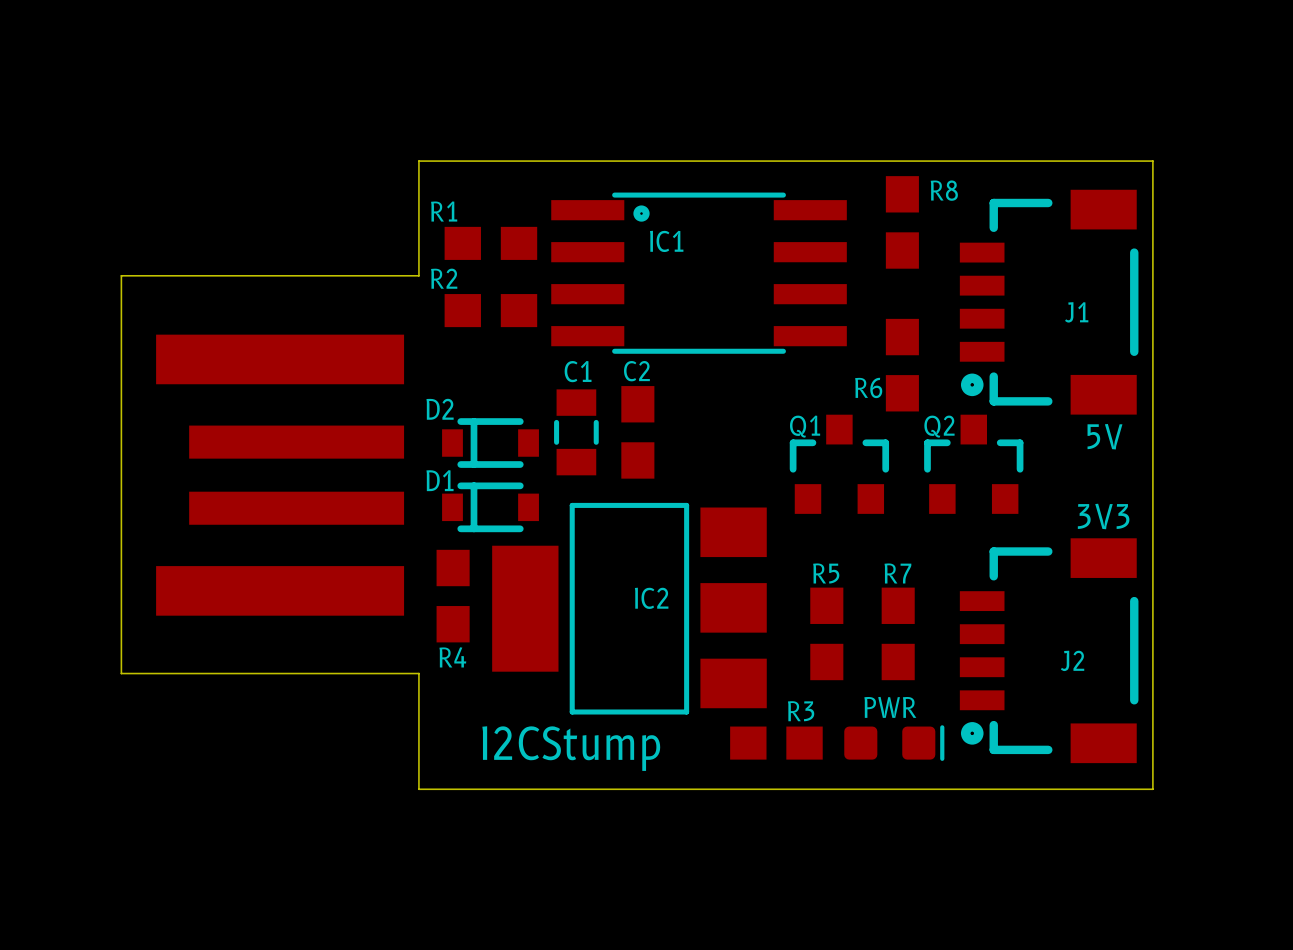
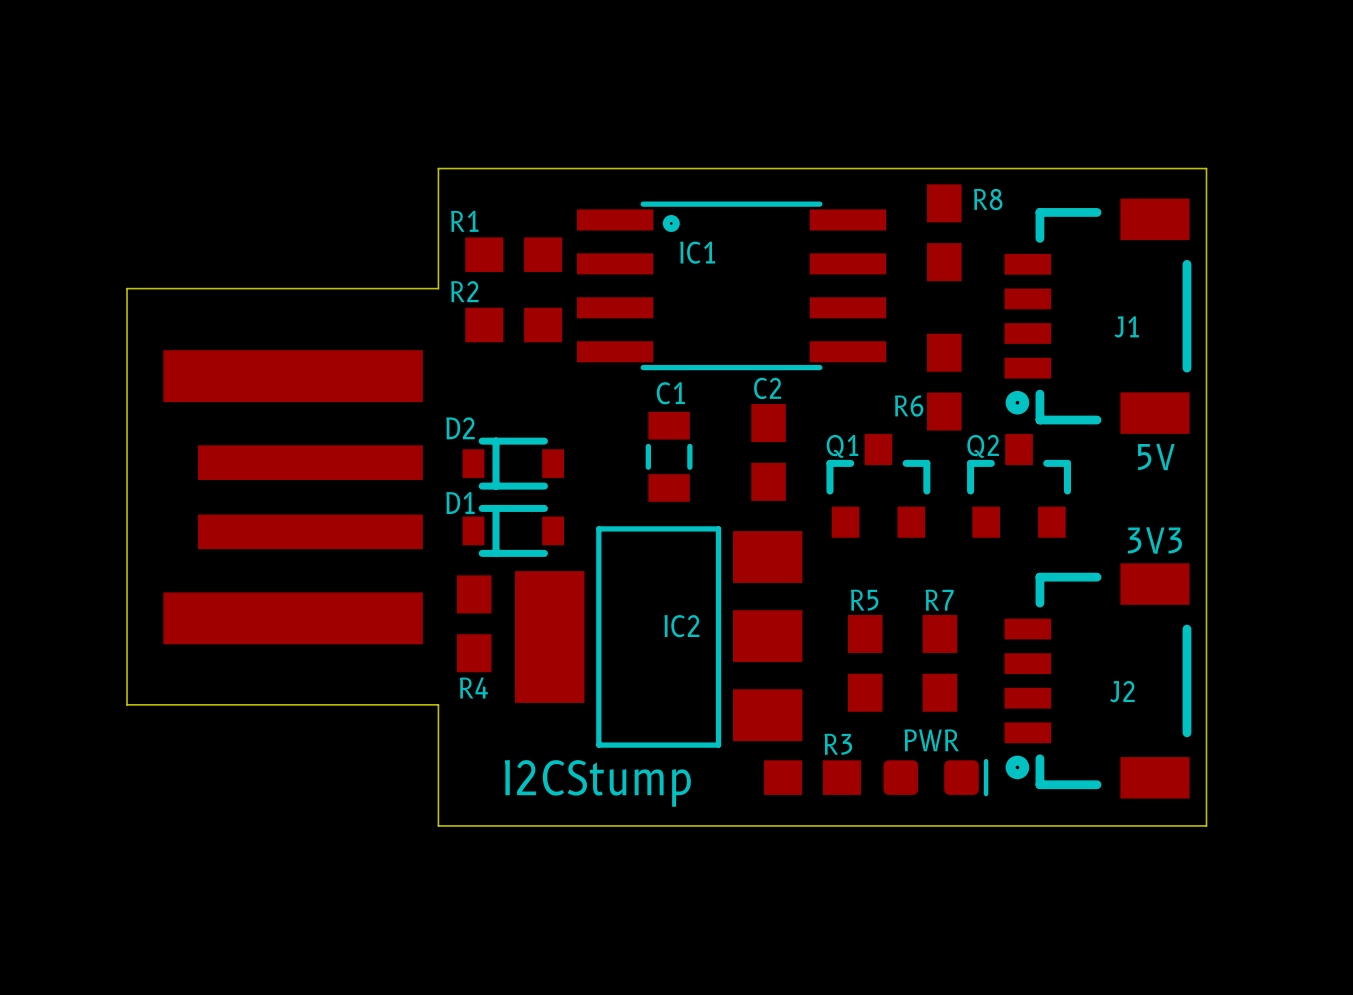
text position: C1 (578, 371) -> C1 (670, 393)
part position: (576, 432) -> (669, 456)
C2 position: (637, 432) -> (768, 452)

